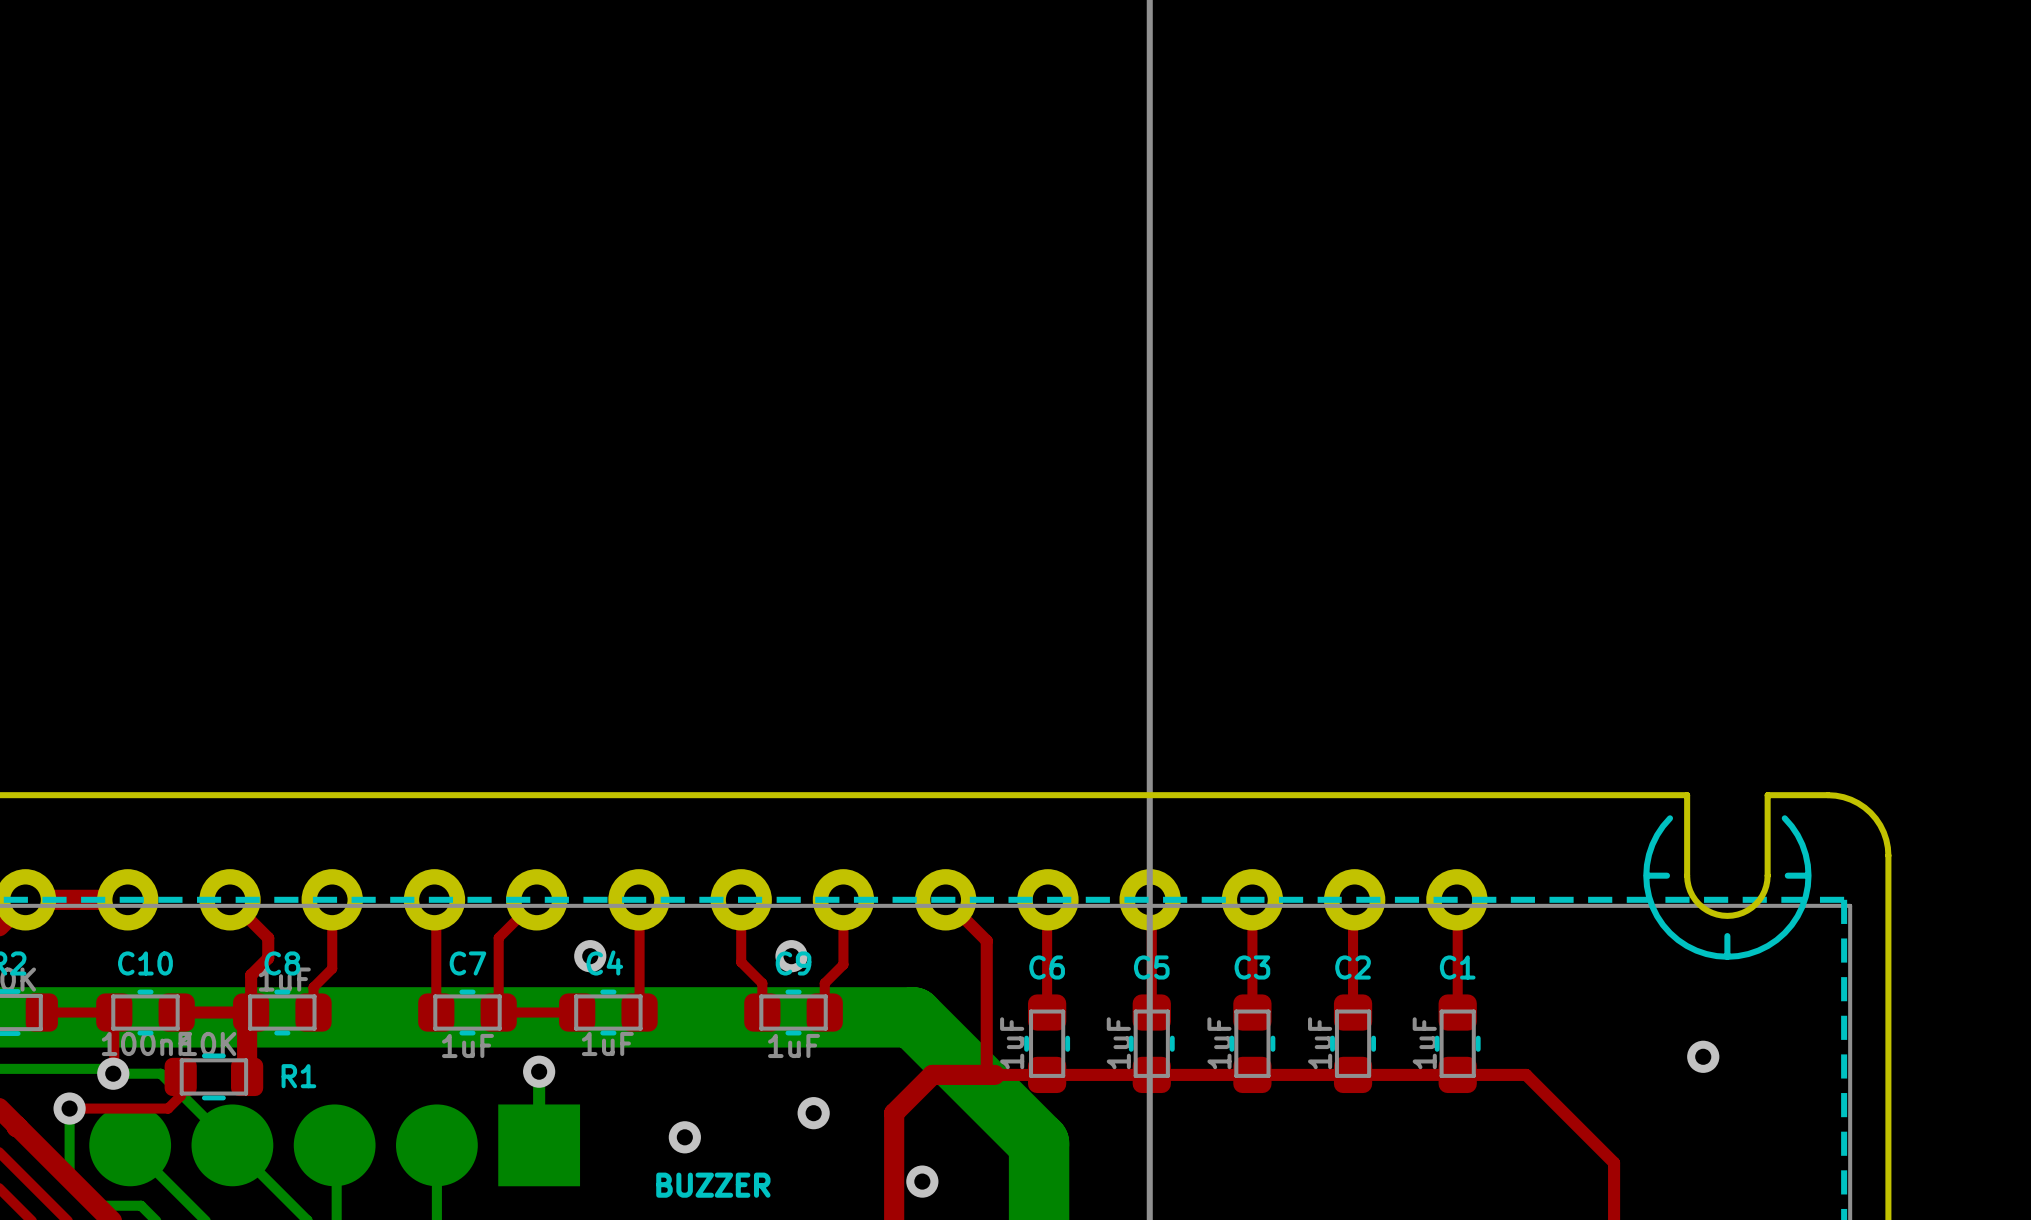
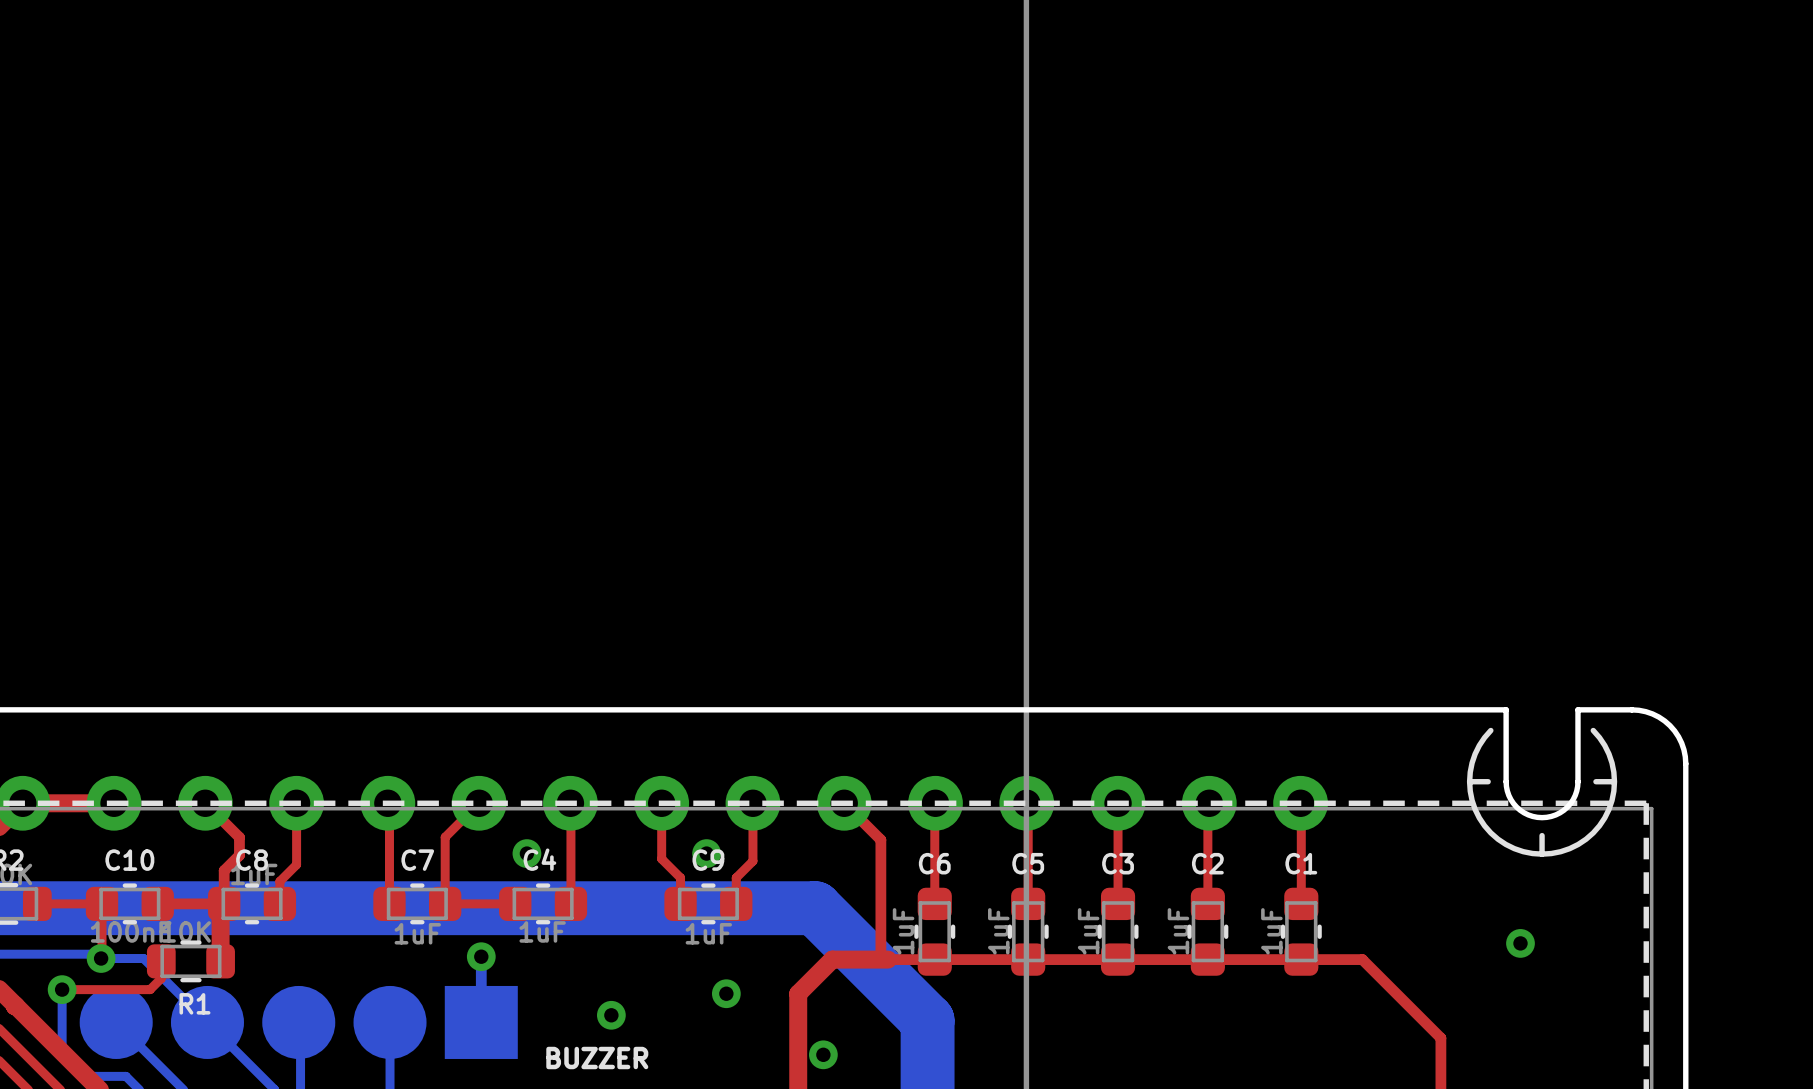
R1 name position: R1 (298, 1076) -> R1 (194, 1003)
text position: BUZZER (713, 1185) -> BUZZER (597, 1058)

